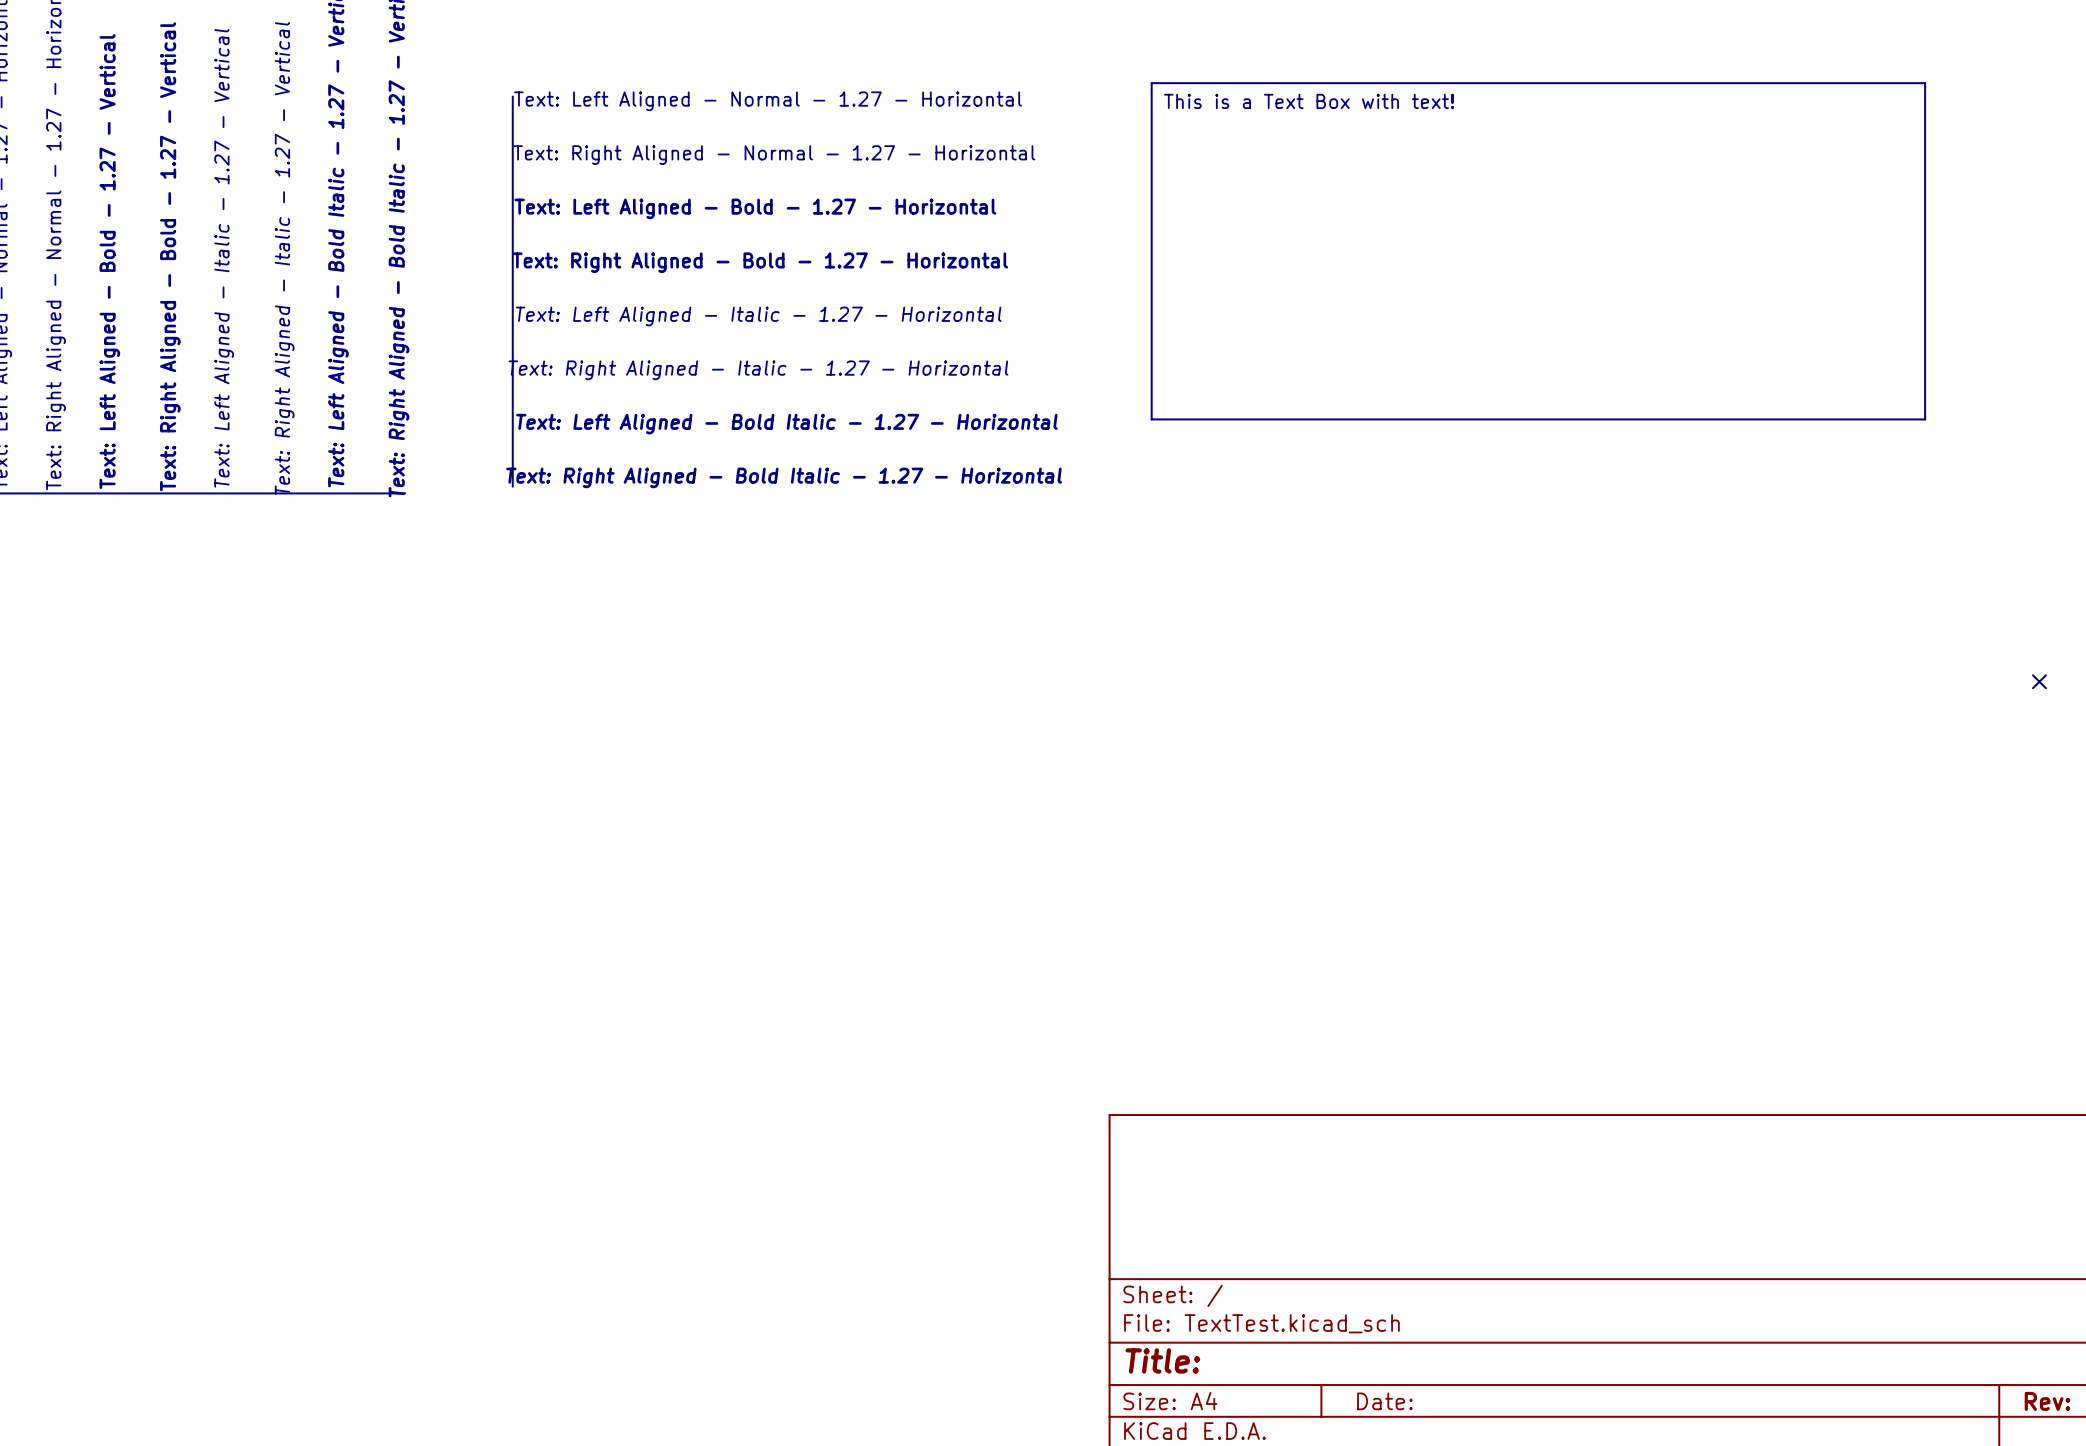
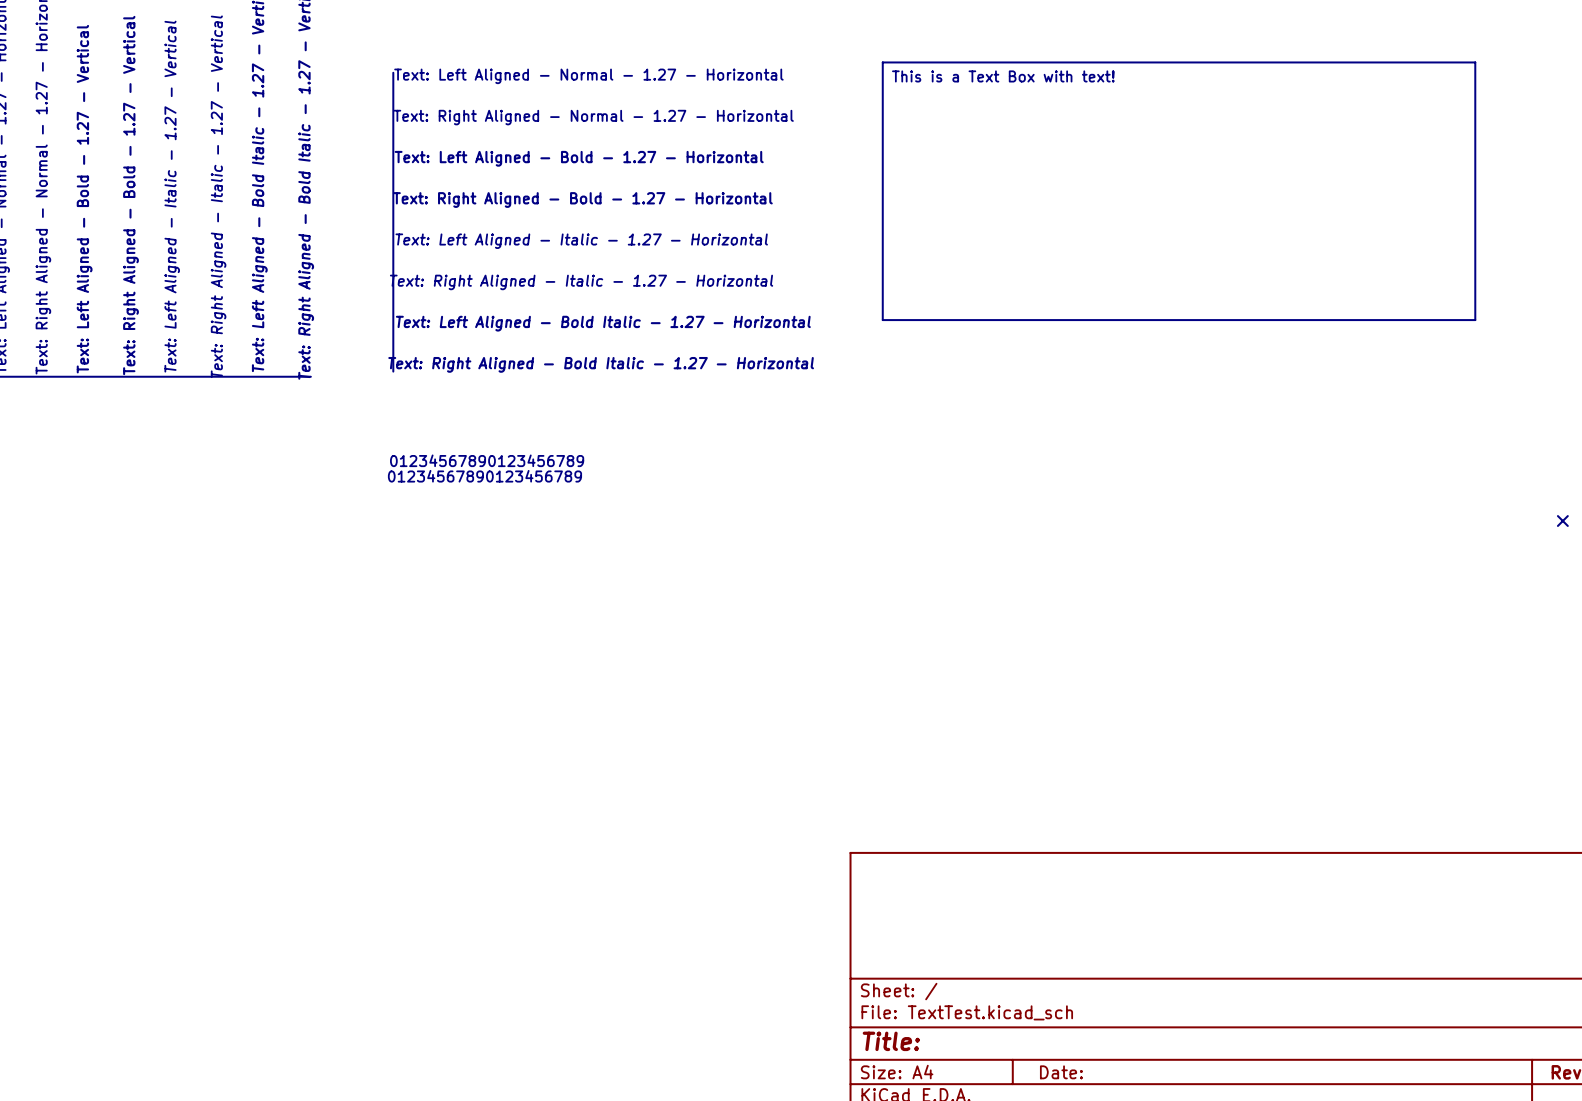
text: none -> 01234567890123456789 (487, 460)
text: none -> 01234567890123456789 (484, 476)

